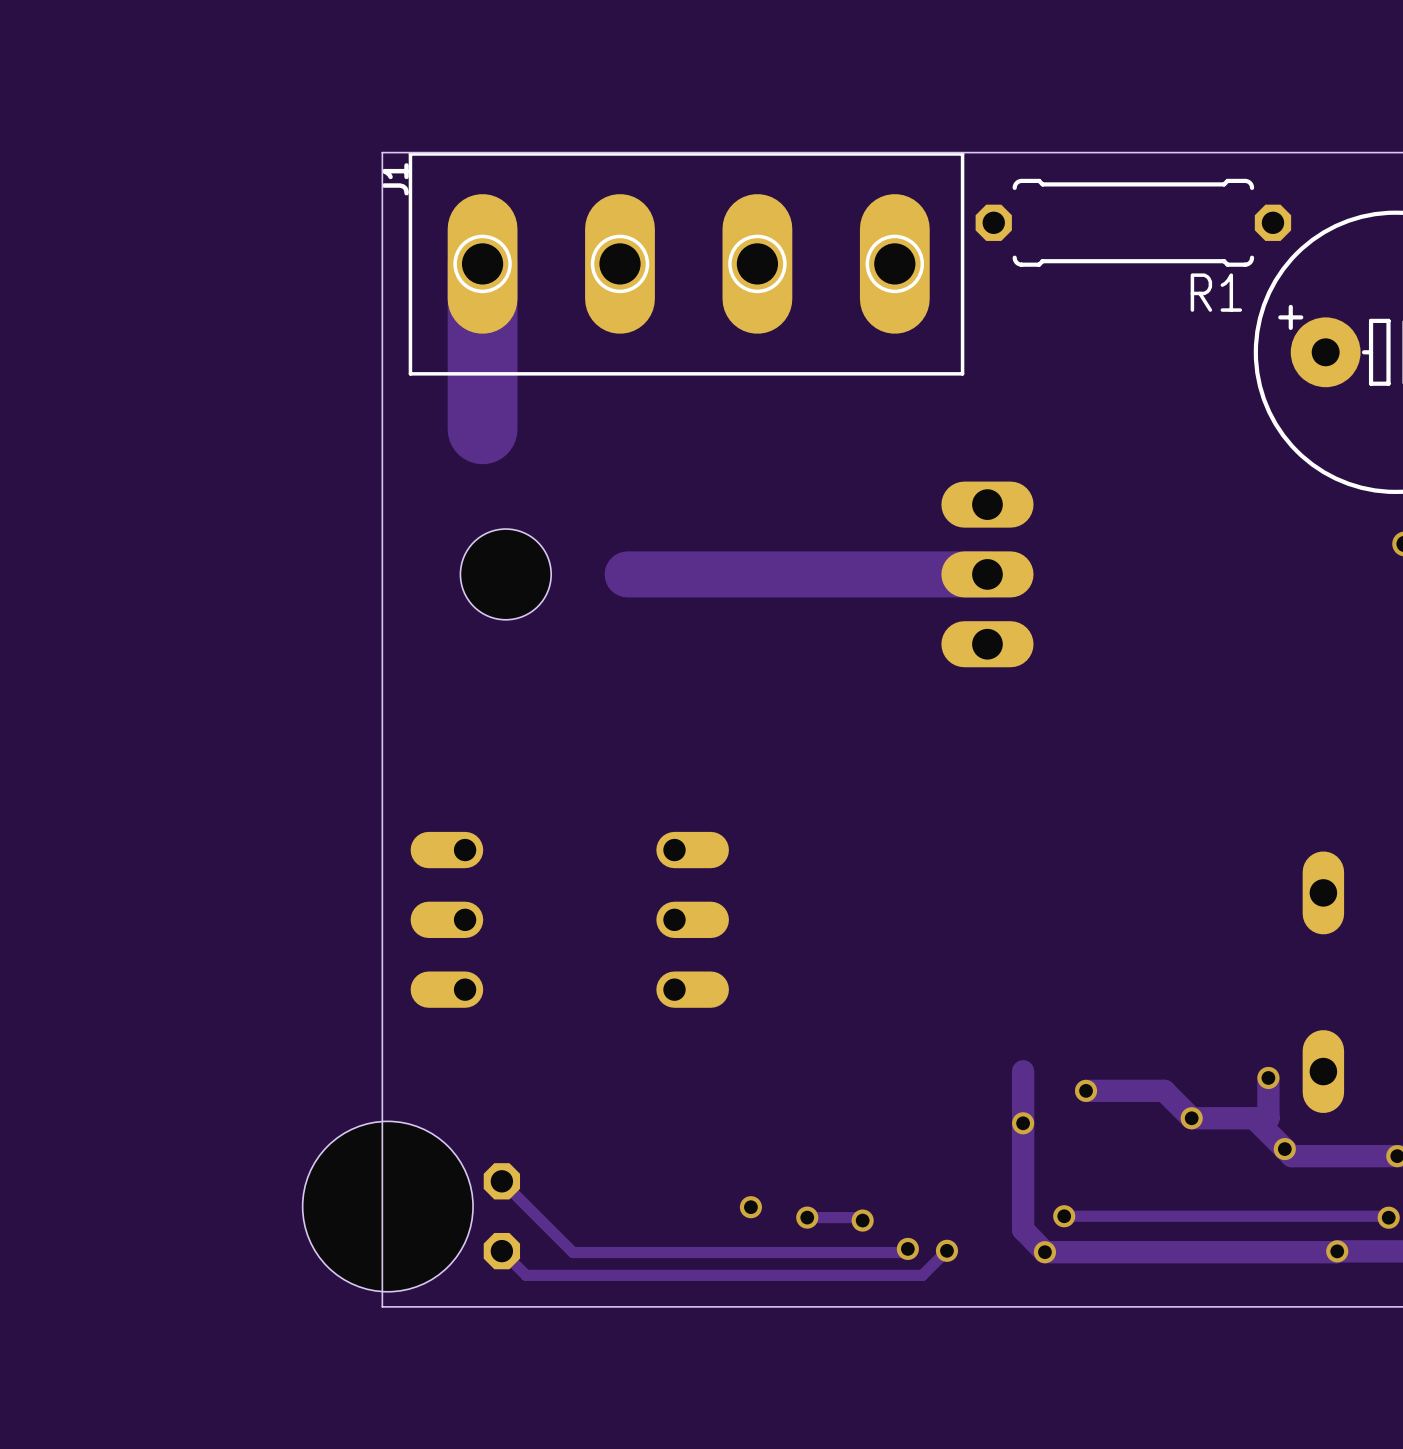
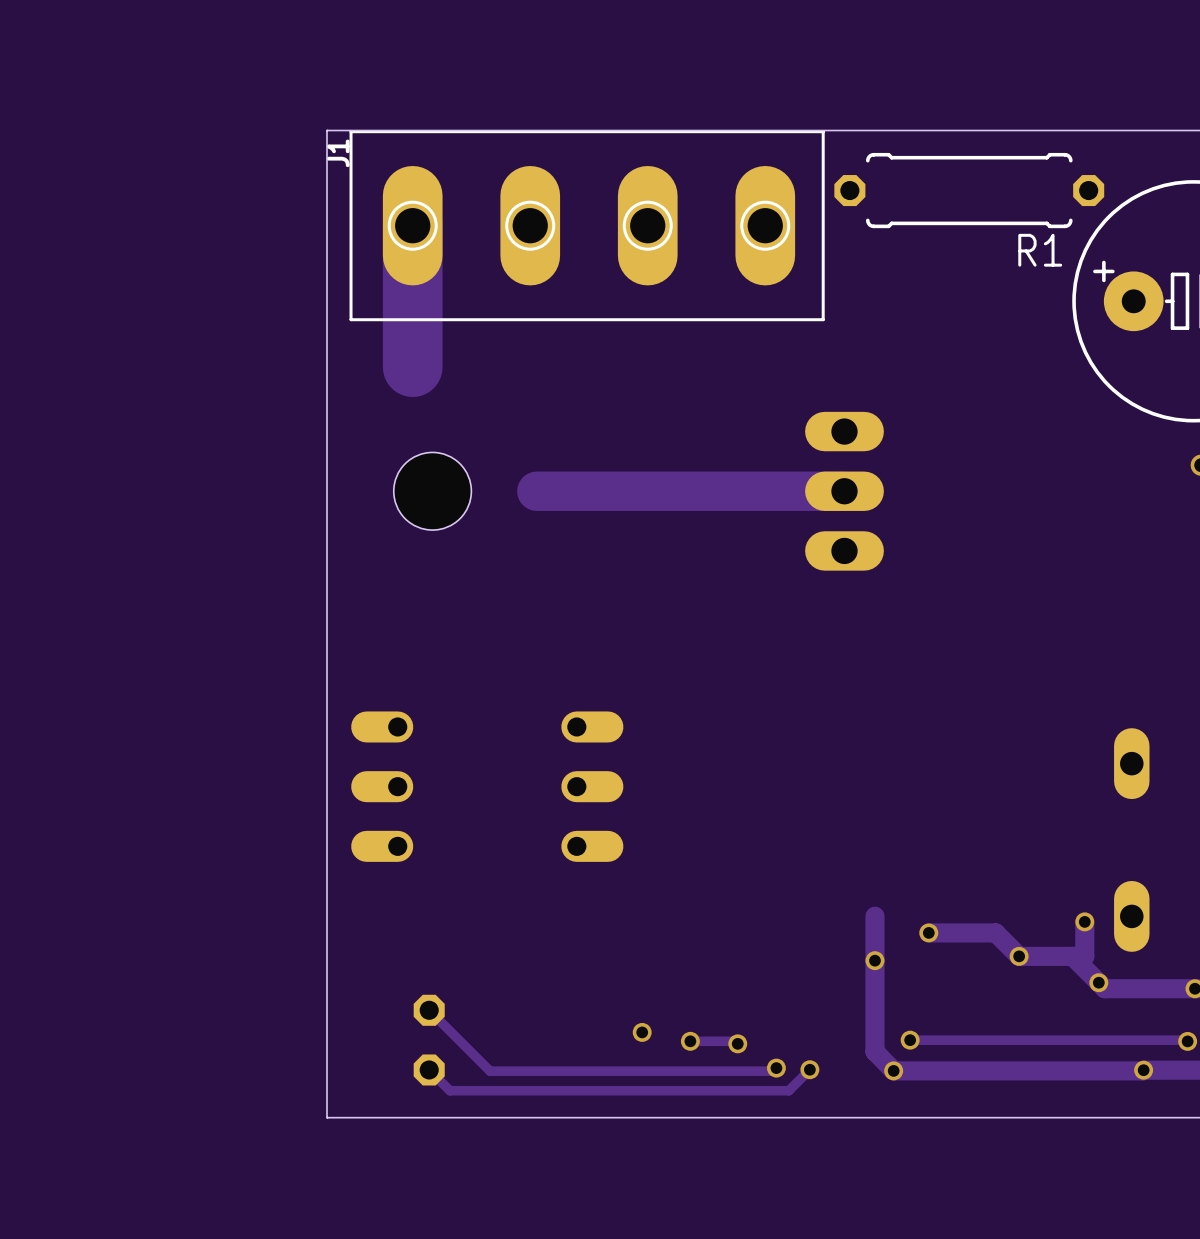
hole: (387, 1206) -> none

